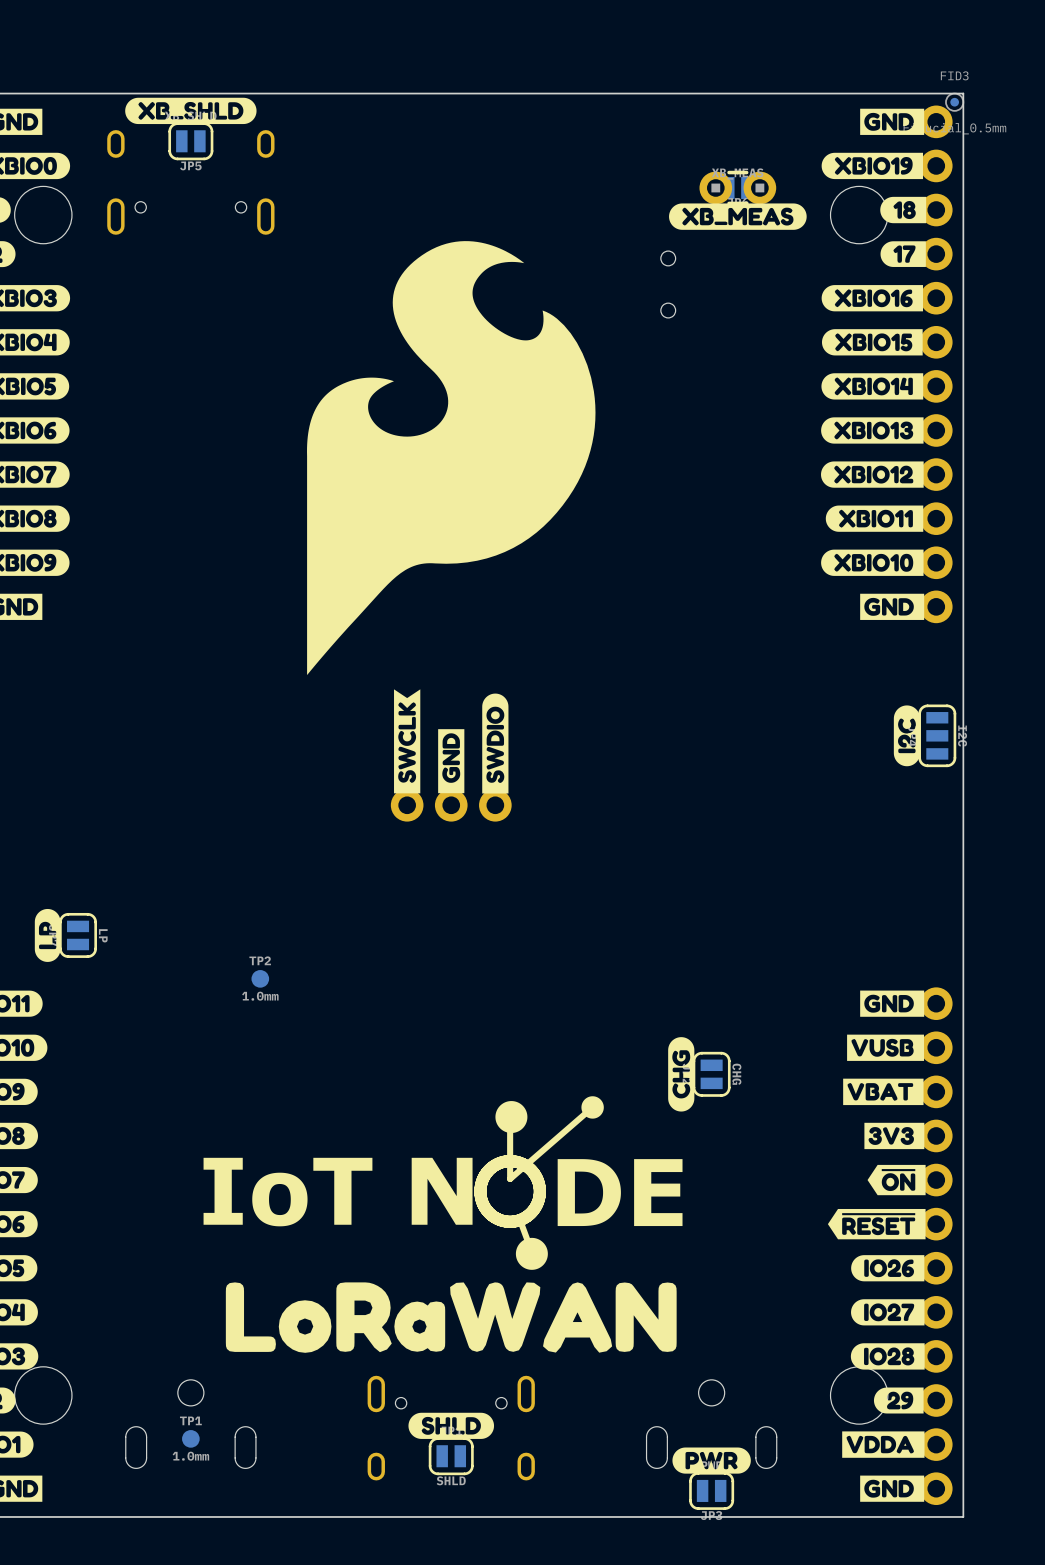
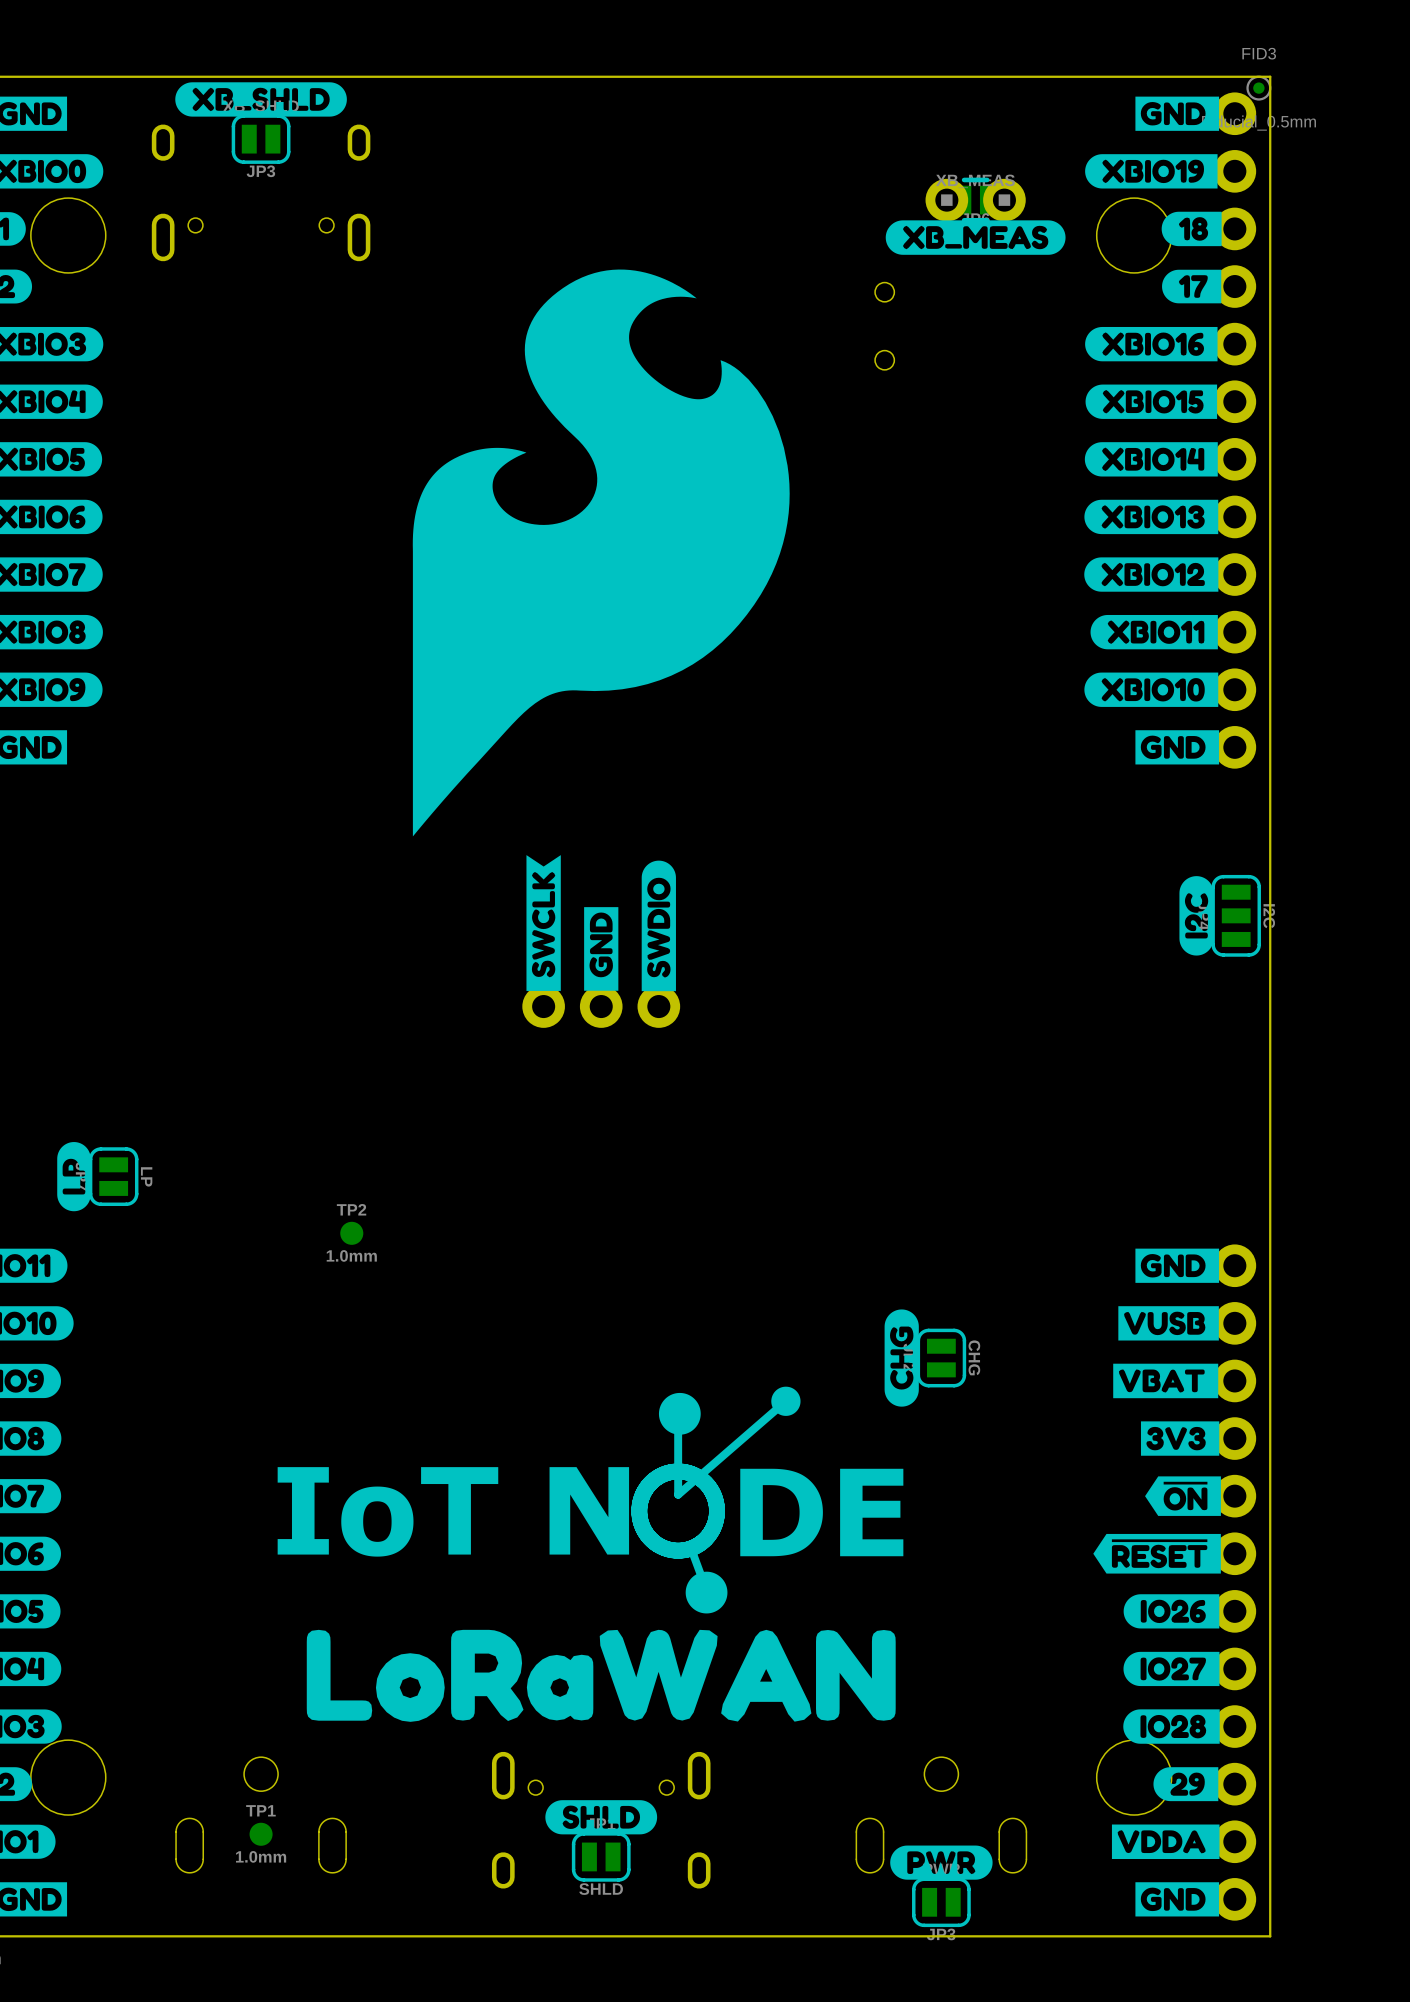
JP5 name: JP5 (190, 165) -> JP3 (260, 171)

